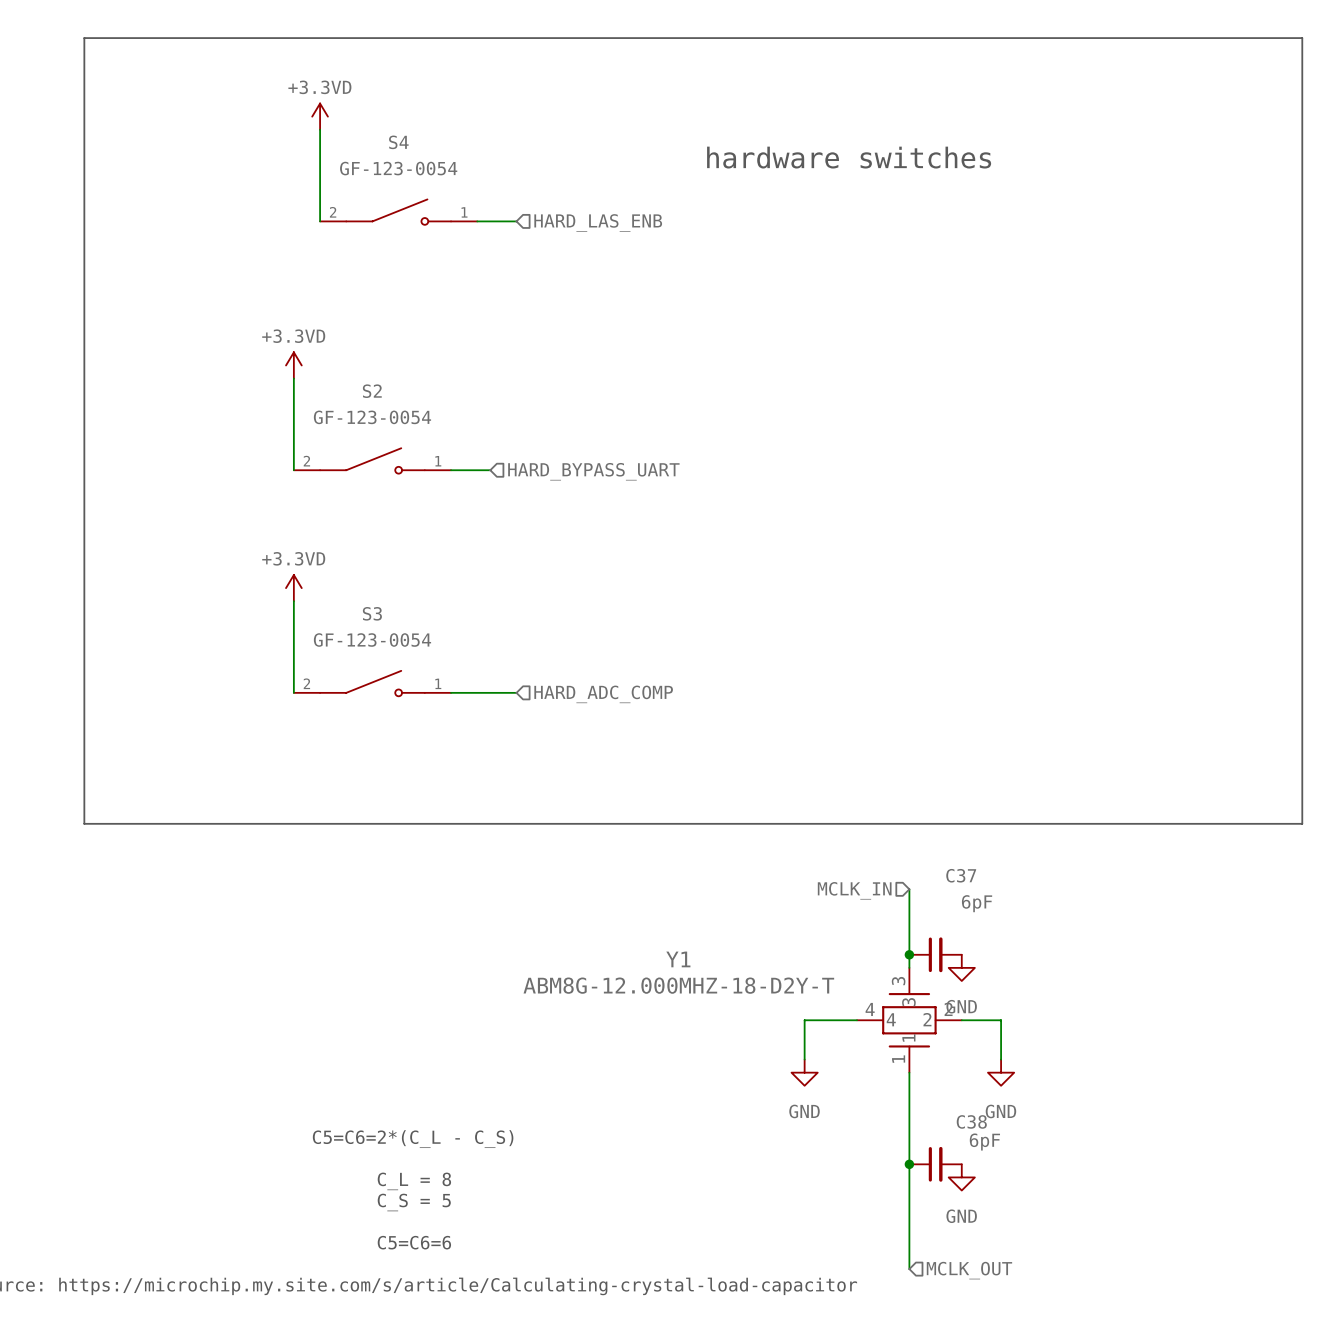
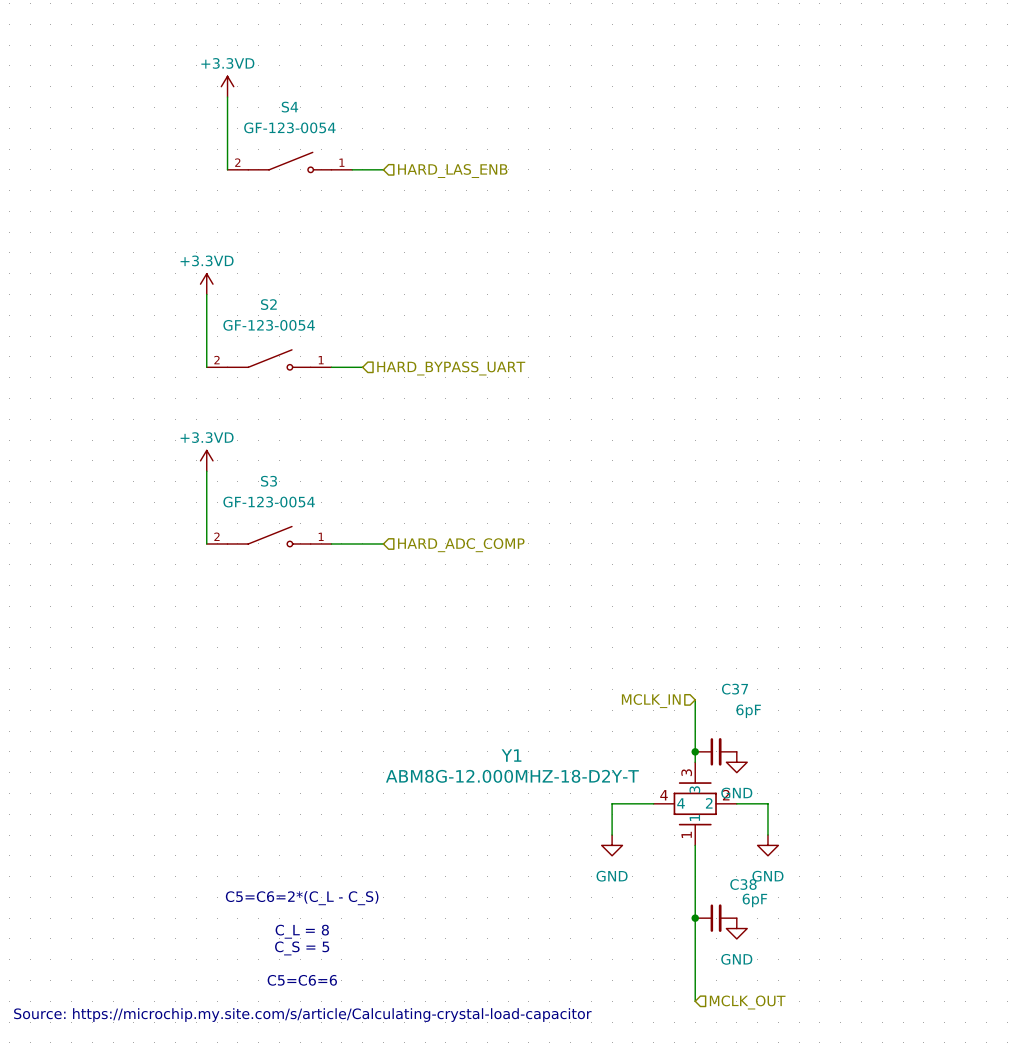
line: (84, 38) (1302, 38) (1302, 823) (84, 823) (84, 38) -> none
text: hardware switches (849, 157) -> none

